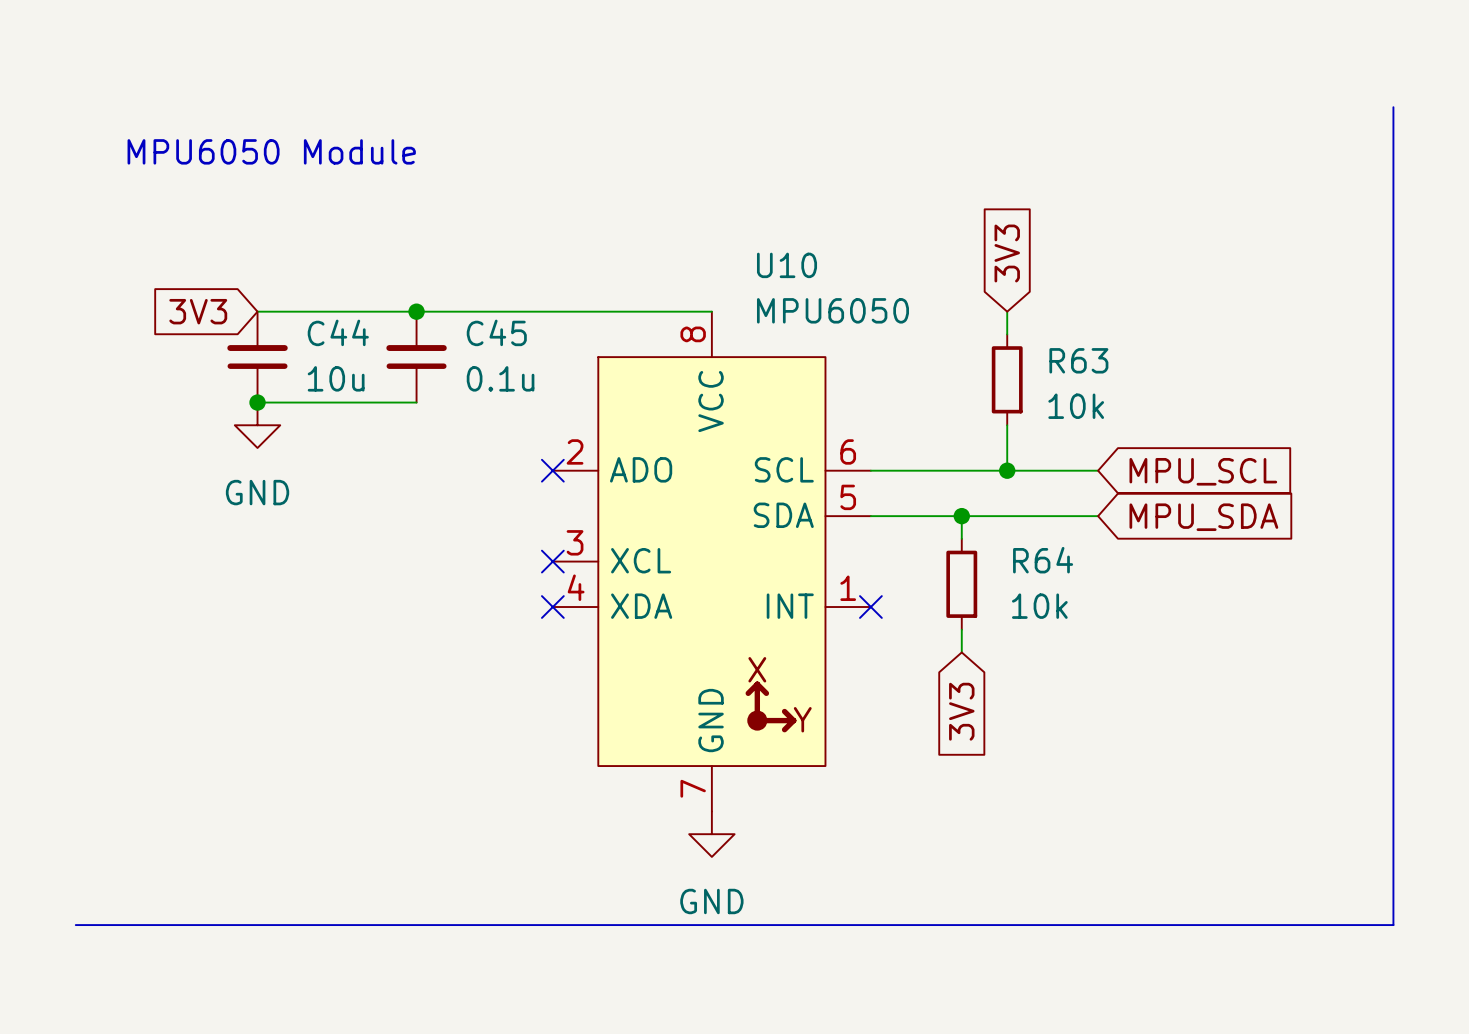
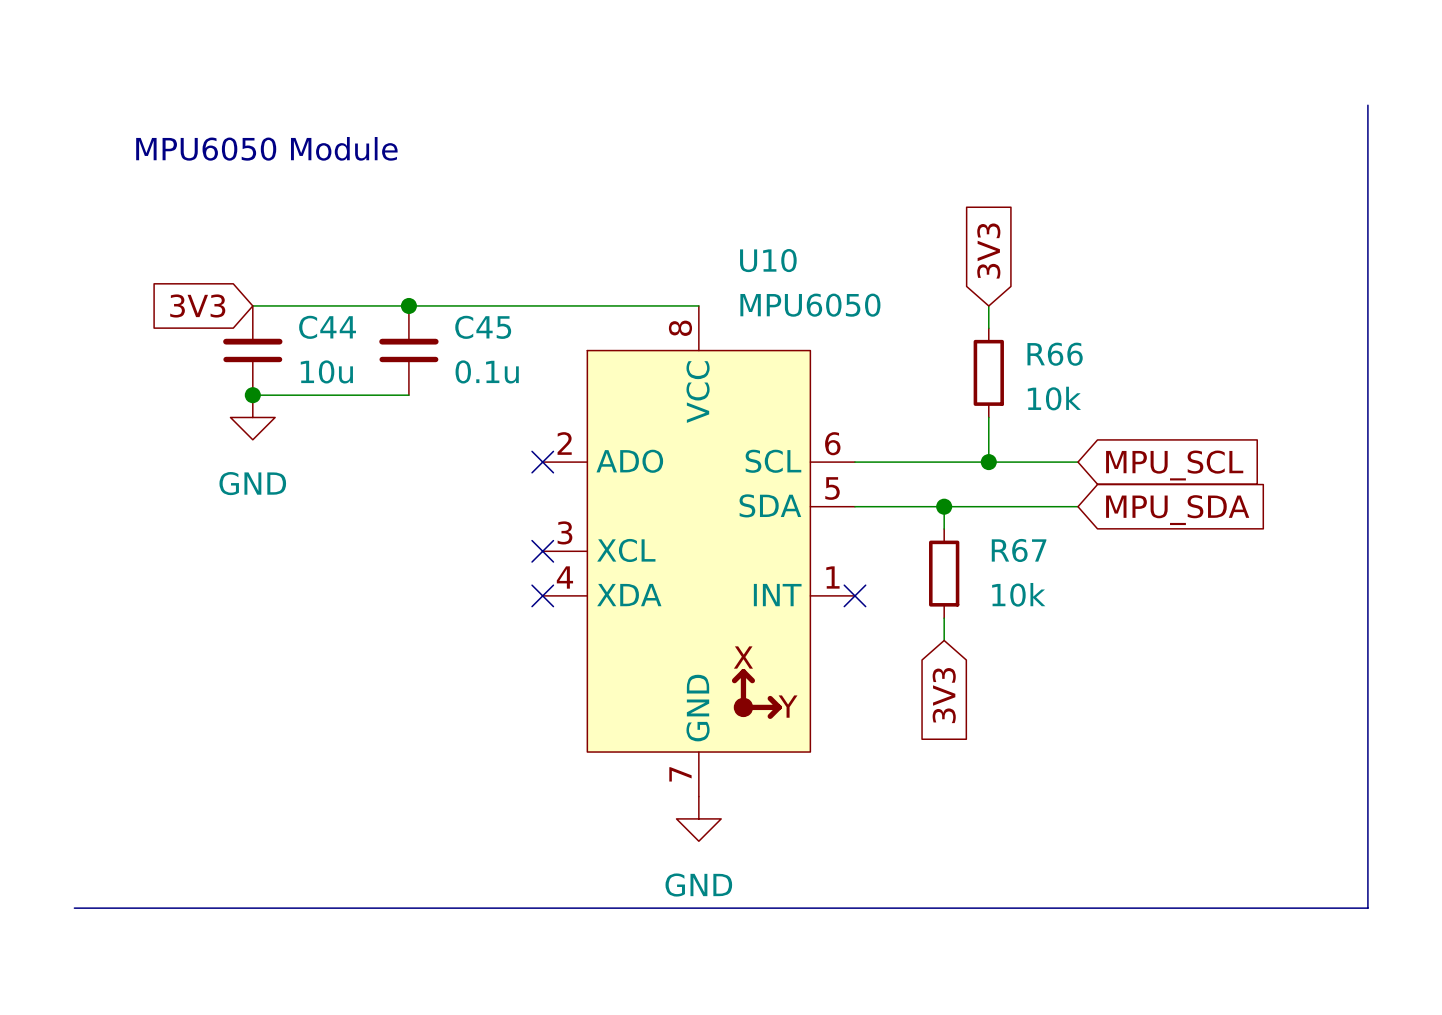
R63 name: R63 (1078, 360) -> R66 (1055, 354)
R64 name: R64 (1043, 560) -> R67 (1019, 550)

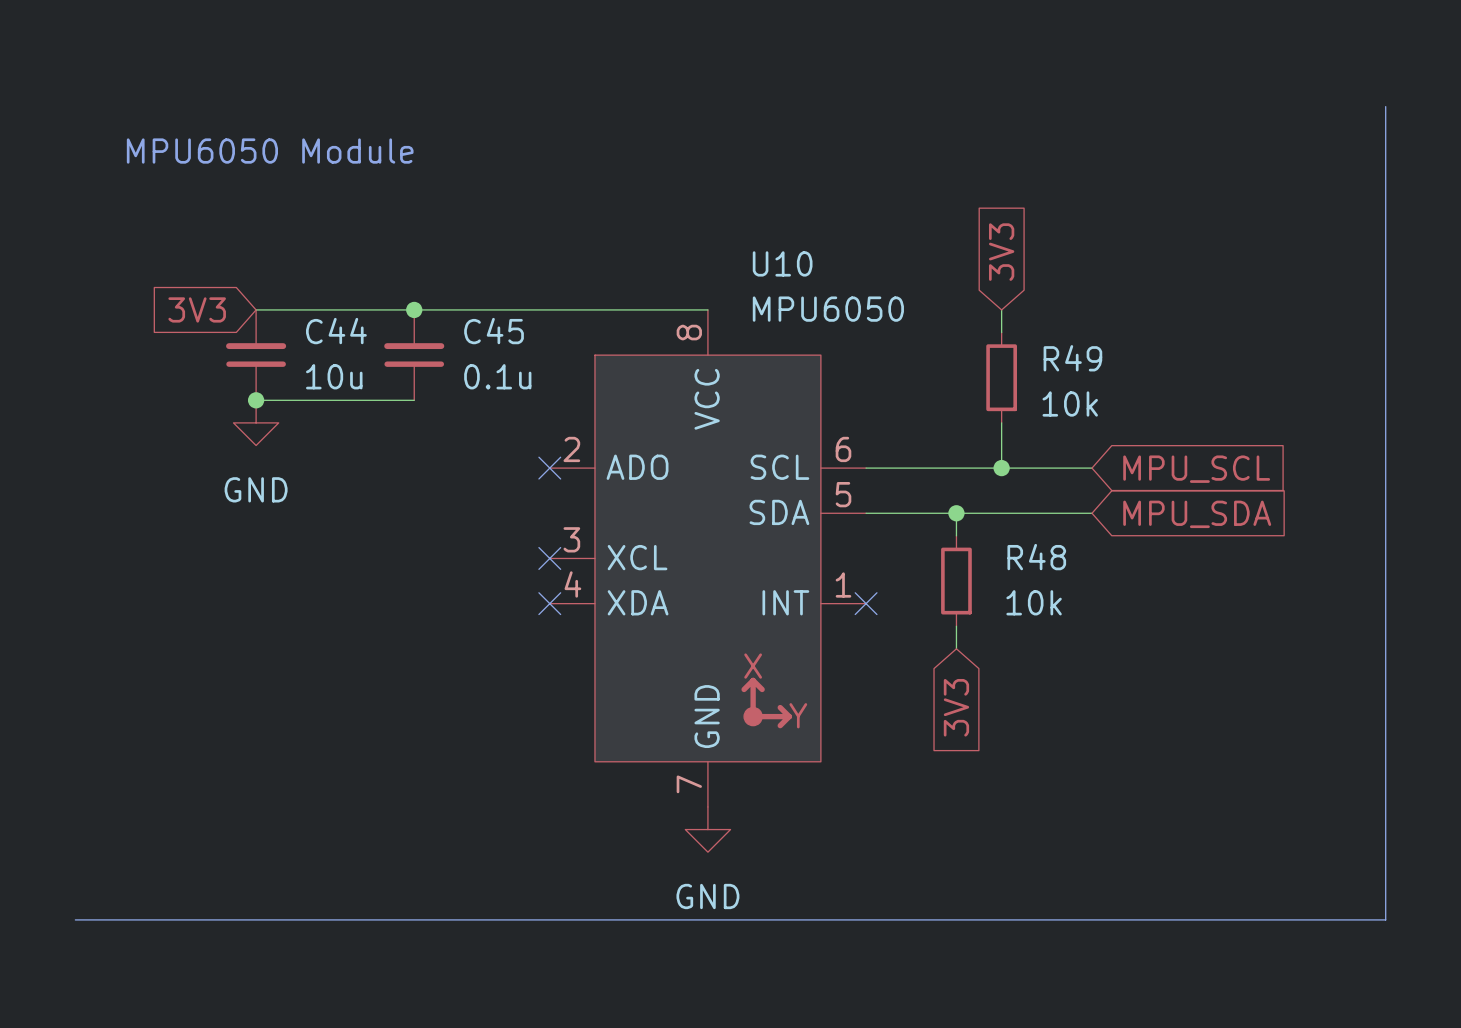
R66 name: R66 (1055, 354) -> R49 (1072, 358)
R67 name: R67 (1019, 550) -> R48 (1036, 557)

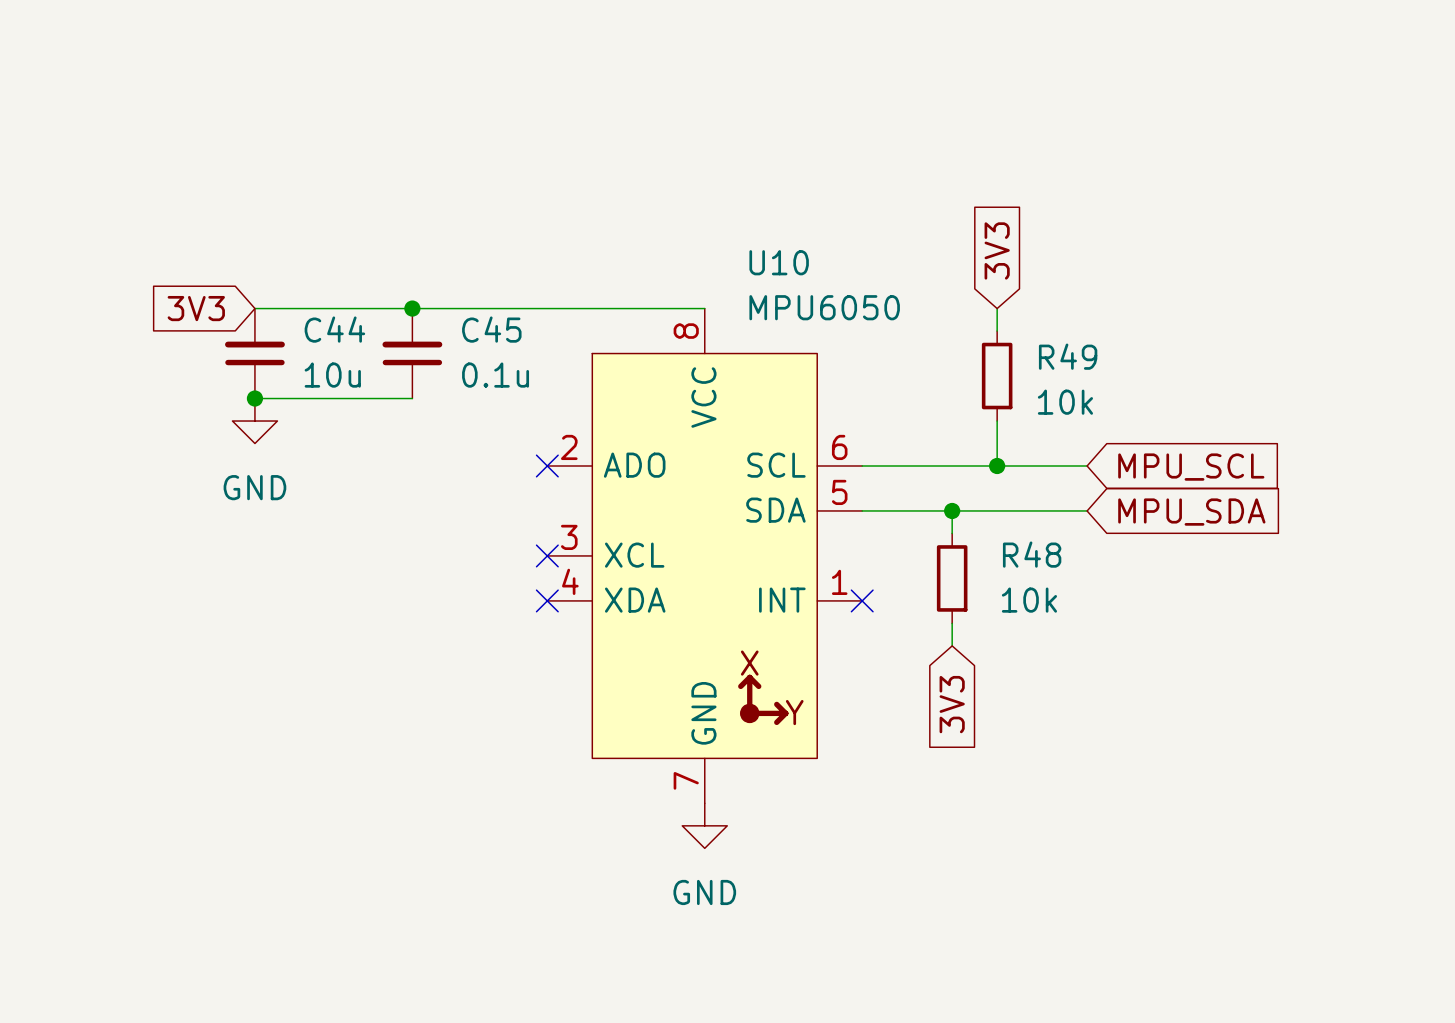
line: (1385, 106) (1385, 919) (75, 919) -> none
text: MPU6050 Module (270, 151) -> none

